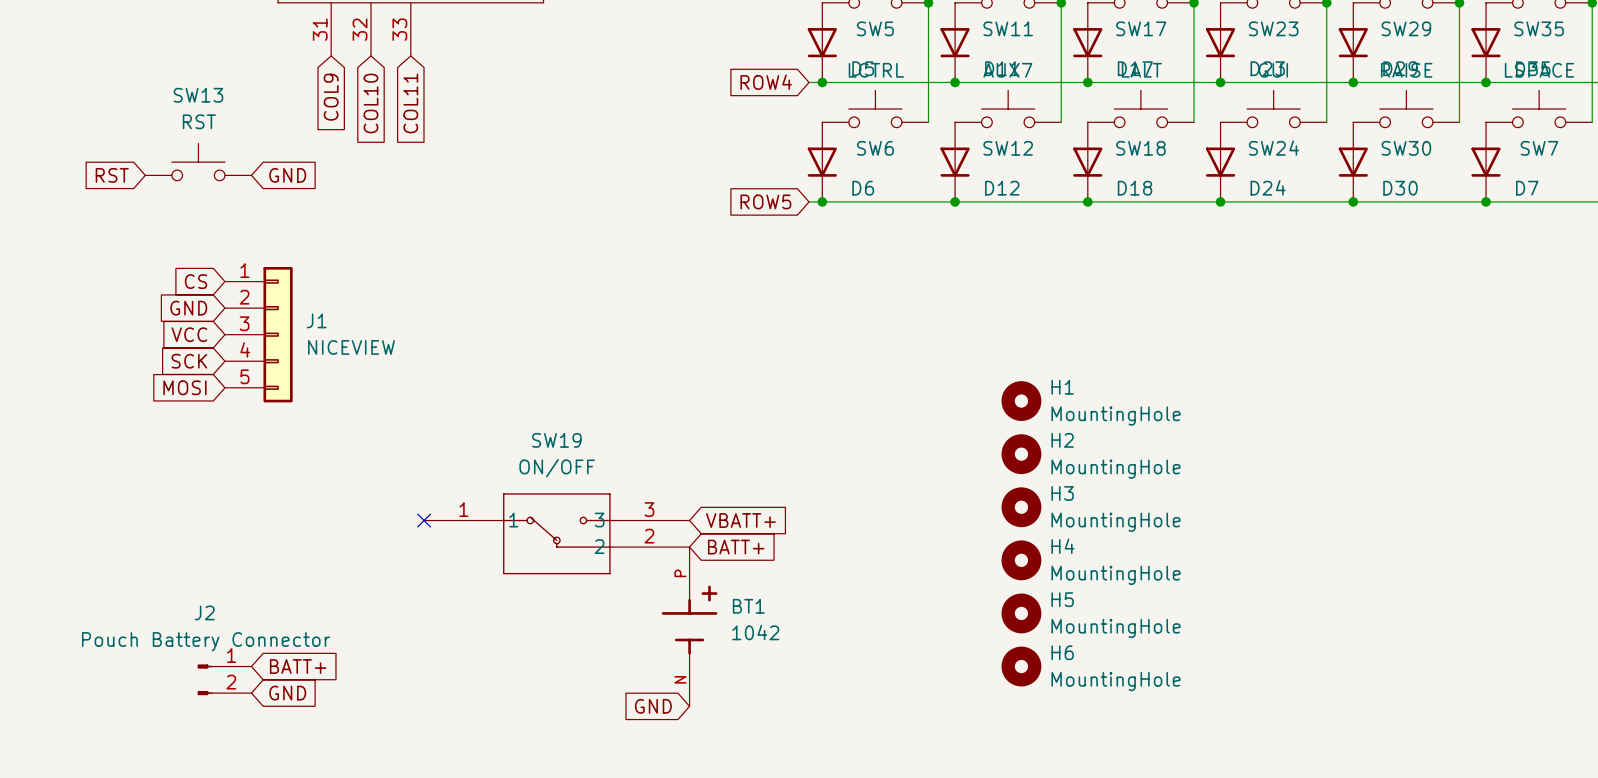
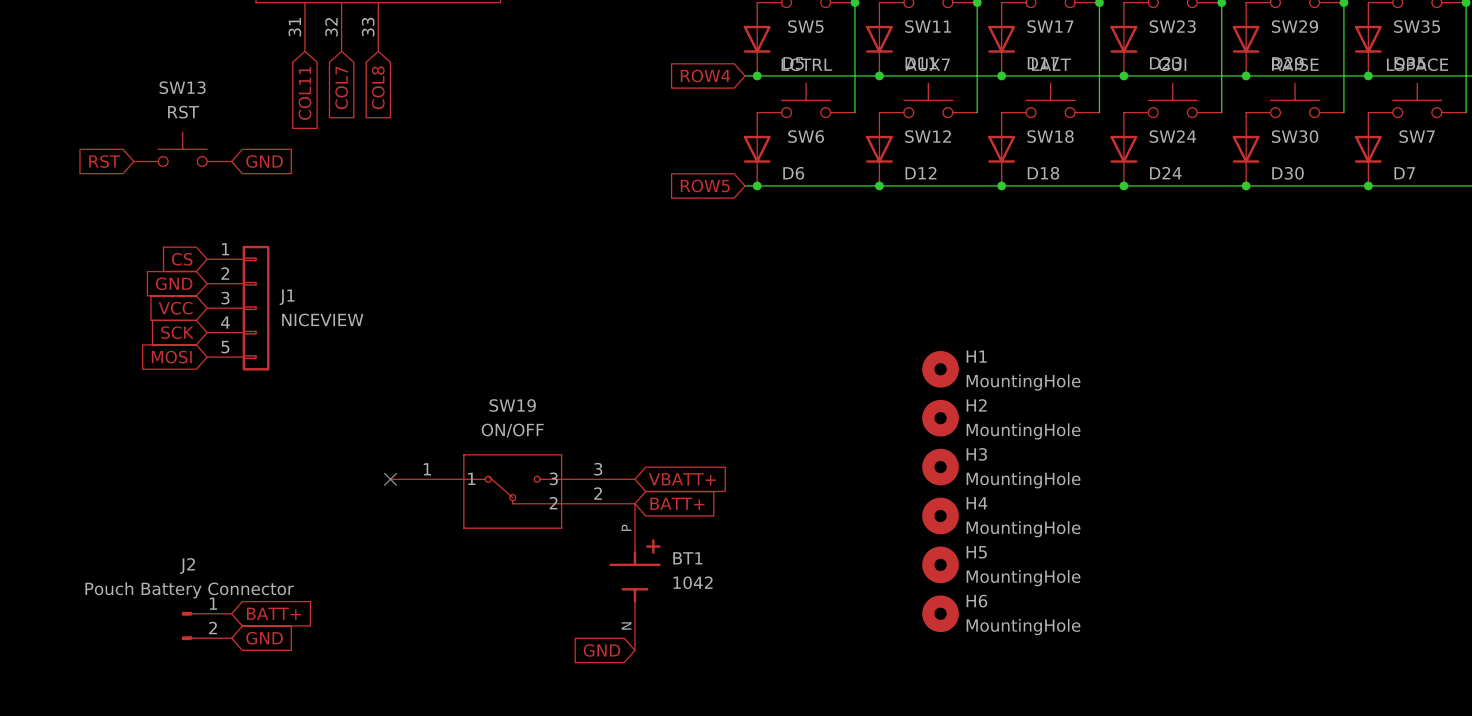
global label: COL9 (331, 97) -> COL11 (304, 93)
global label: COL10 (370, 103) -> COL7 (341, 87)
global label: COL11 (410, 103) -> COL8 (378, 87)

